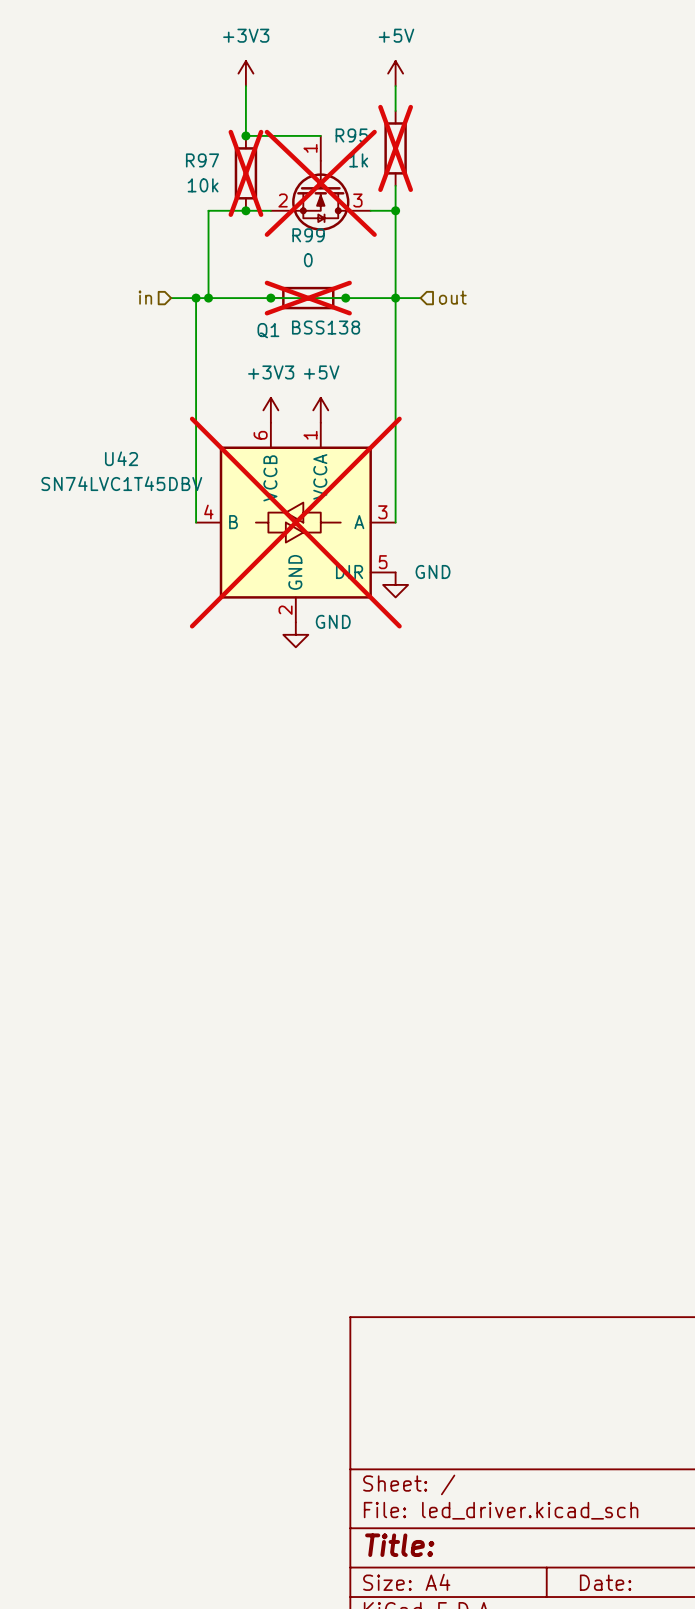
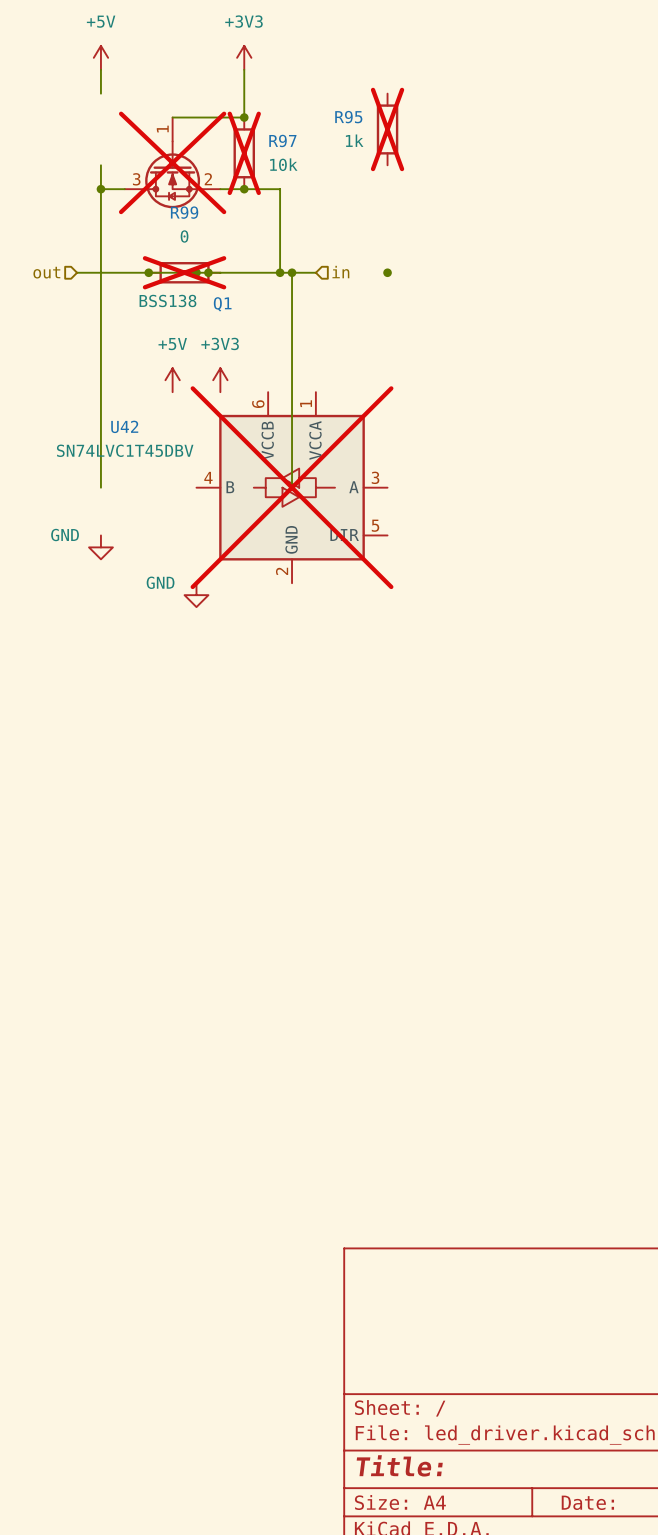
power symbol: none -> +5V (100, 57)
power symbol: +5V (395, 73) -> none
wire: none -> (100, 69) (100, 93)
wire: (395, 86) (395, 111) -> none
wire: (245, 135) (320, 135) -> (244, 117) (172, 117)
R97 name position: R97 (202, 160) -> R97 (282, 140)
Q1 position: (320, 183) -> (172, 162)
wire: none -> (100, 165) (100, 487)
R97 value position: 10k (203, 185) -> 10k (283, 164)
wire: (395, 185) (395, 522) -> none
Q1 flip: as is (320, 195) -> left-right (172, 174)
wire: none -> (100, 189) (124, 189)
junction: none -> (100, 189)
wire: (221, 210) (208, 210) (208, 298) -> none
wire: none -> (268, 189) (280, 189) (280, 272)
wire: (370, 210) (395, 210) -> none
junction: (395, 210) -> none
hierarchical label: none -> out (46, 272)
hierarchical label rotation: 0° (145, 297) -> 180° (340, 272)
hierarchical label position: in (145, 297) -> in (340, 272)
hierarchical label: out (452, 297) -> none
wire: none -> (77, 272) (172, 272)
junction: none -> (148, 272)
wire: (196, 298) (196, 522) -> (292, 272) (292, 487)
junction: (270, 298) -> none
junction: none -> (280, 272)
junction: none -> (292, 272)
R99 position: (308, 298) -> (184, 272)
wire: (320, 298) (420, 298) -> none
junction: (345, 298) -> none
power symbol position: +3V3 (270, 410) -> +3V3 (220, 380)
power symbol position: +5V (320, 410) -> +5V (172, 380)
power symbol: none -> GND (100, 547)
power symbol: GND (395, 584) -> none
power symbol text position: GND (333, 621) -> GND (160, 582)
power symbol position: GND (295, 634) -> GND (196, 595)

